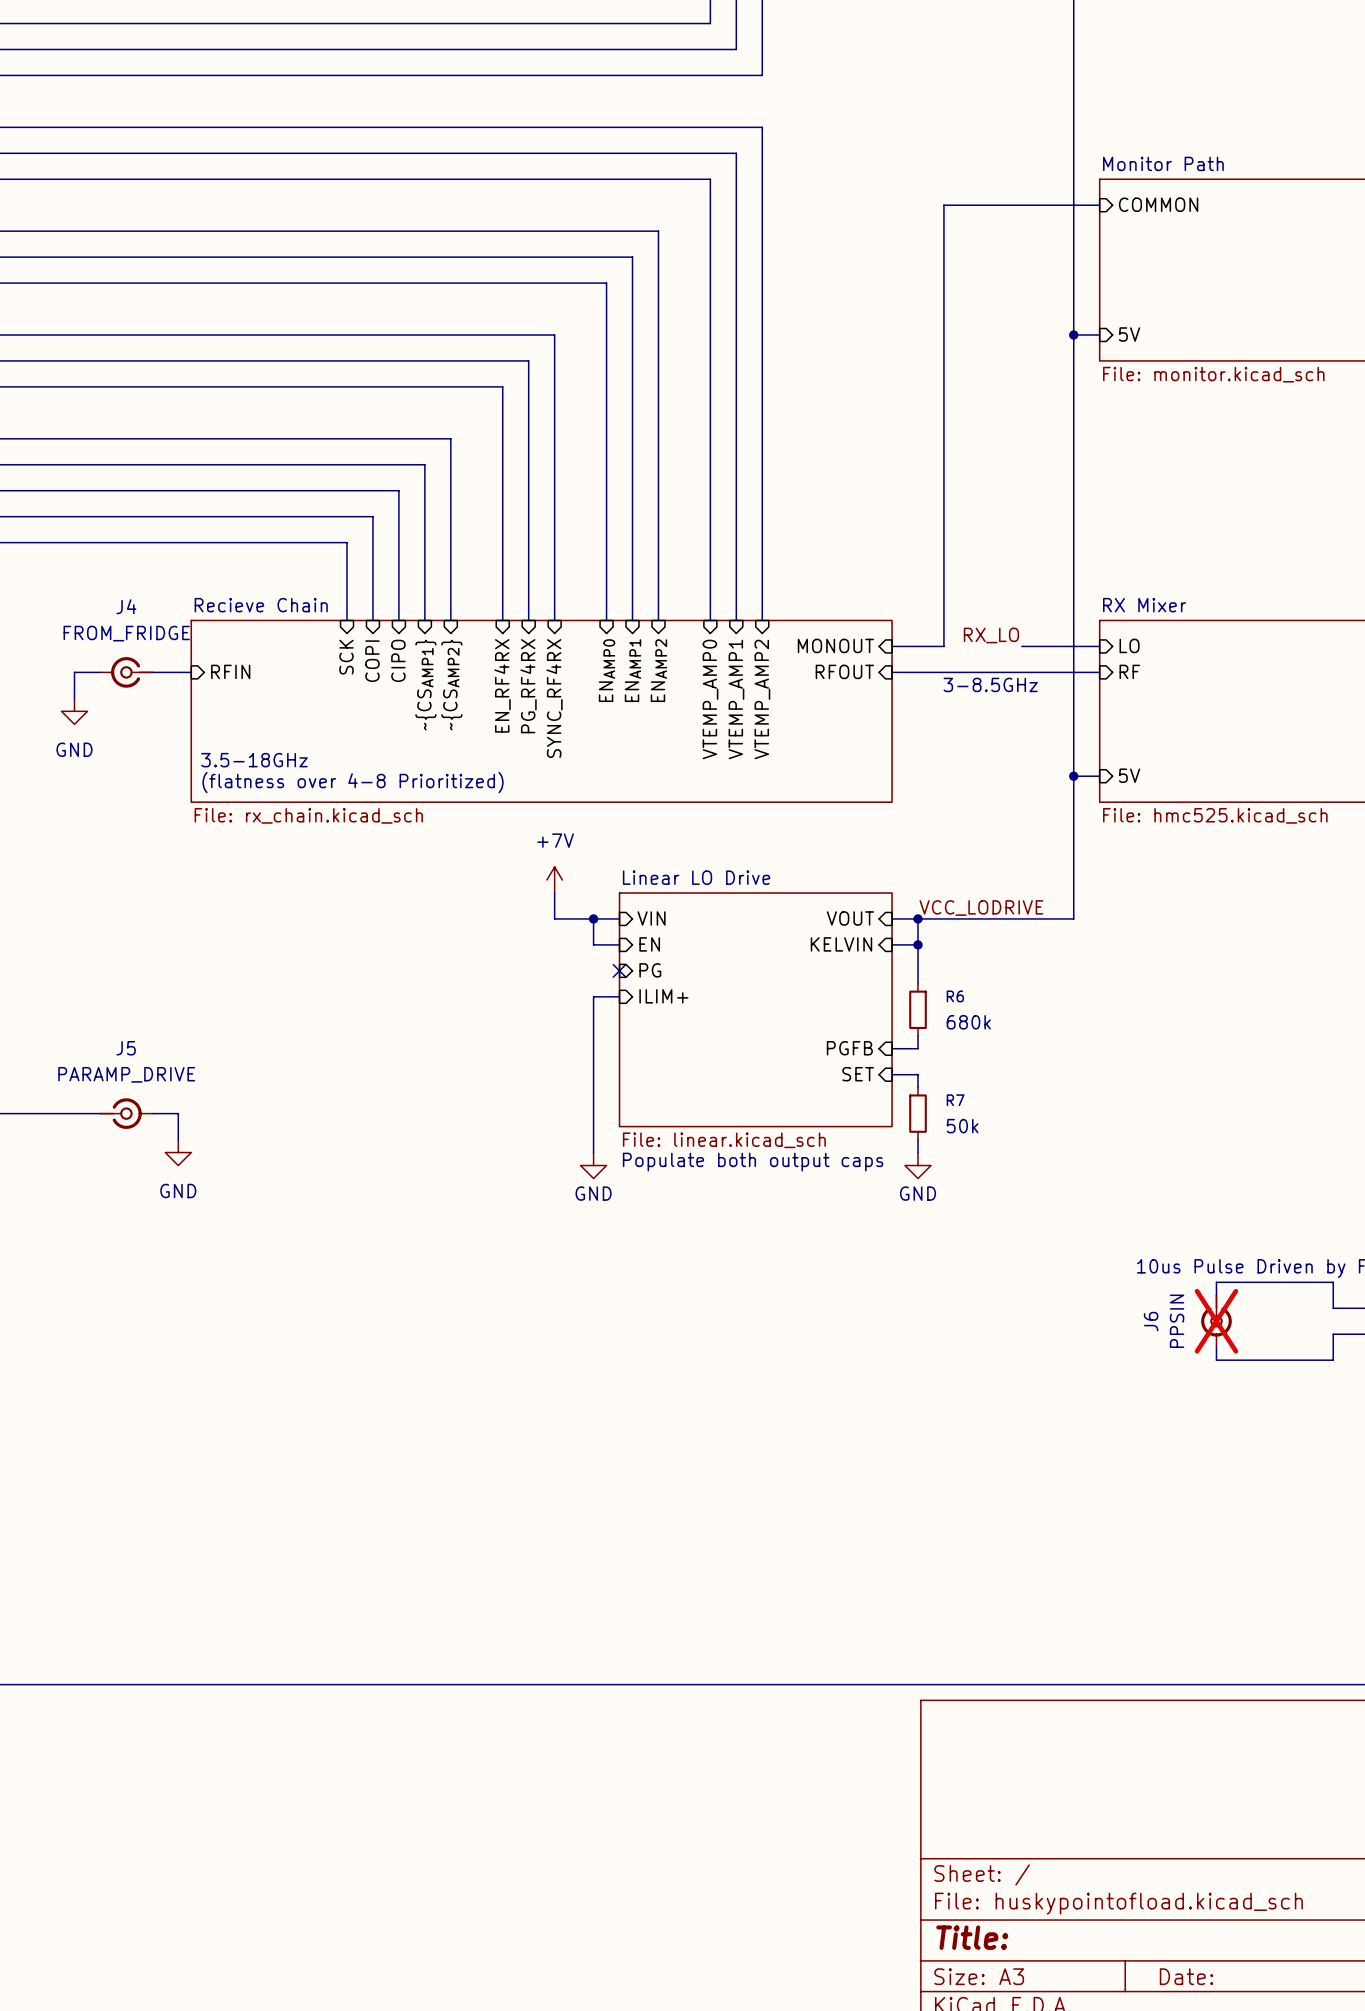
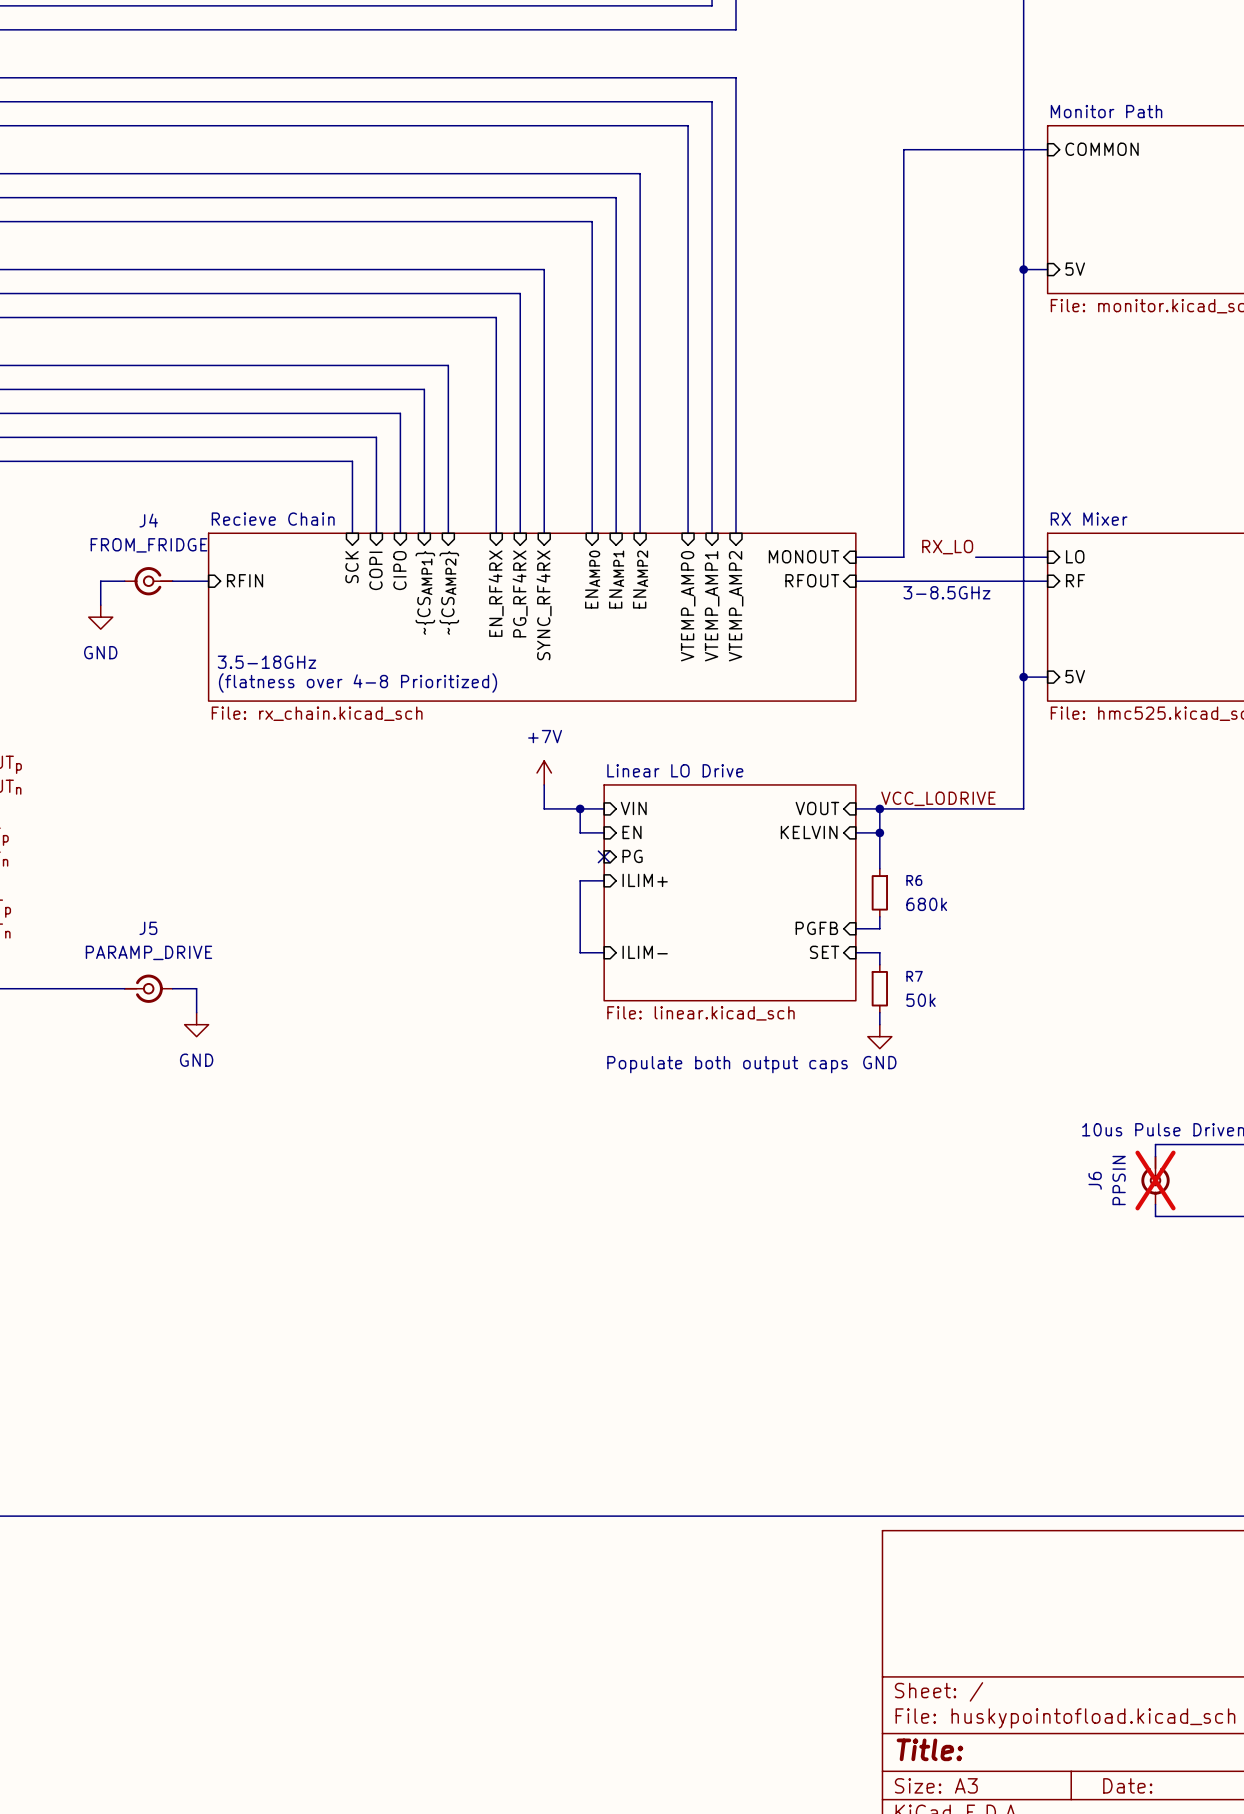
wire: (593, 1074) (593, 1152) -> (580, 952) (604, 952)
sheet pin: none -> ILIM- (645, 952)
text position: Populate both output caps (753, 1162) -> Populate both output caps (727, 1064)
power symbol: GND (593, 1165) -> none

